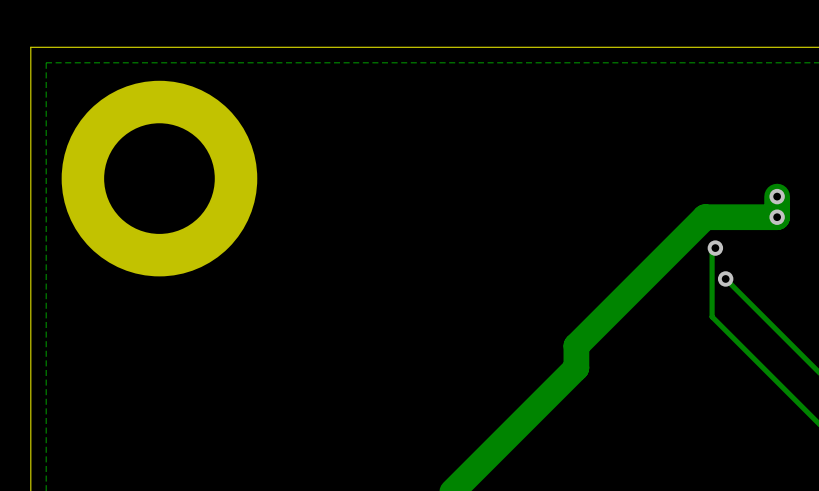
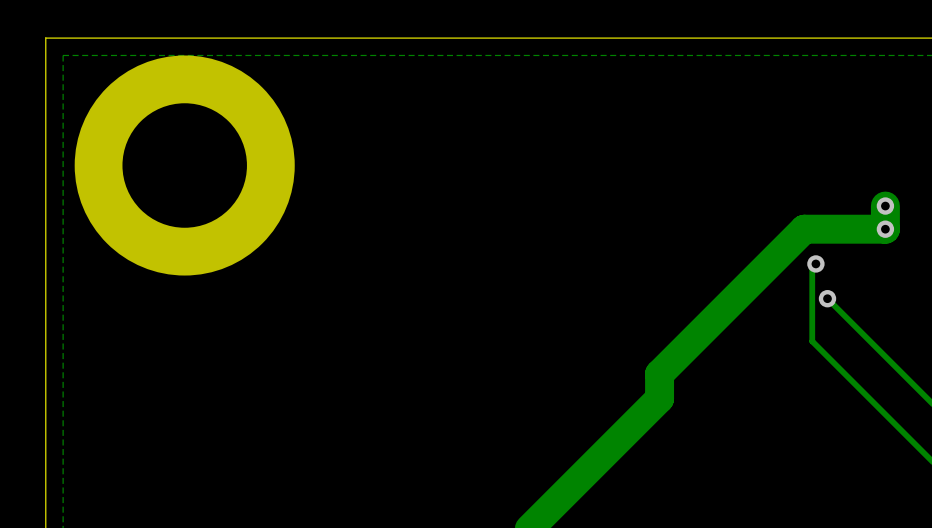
part position: (159, 178) -> (184, 165)

